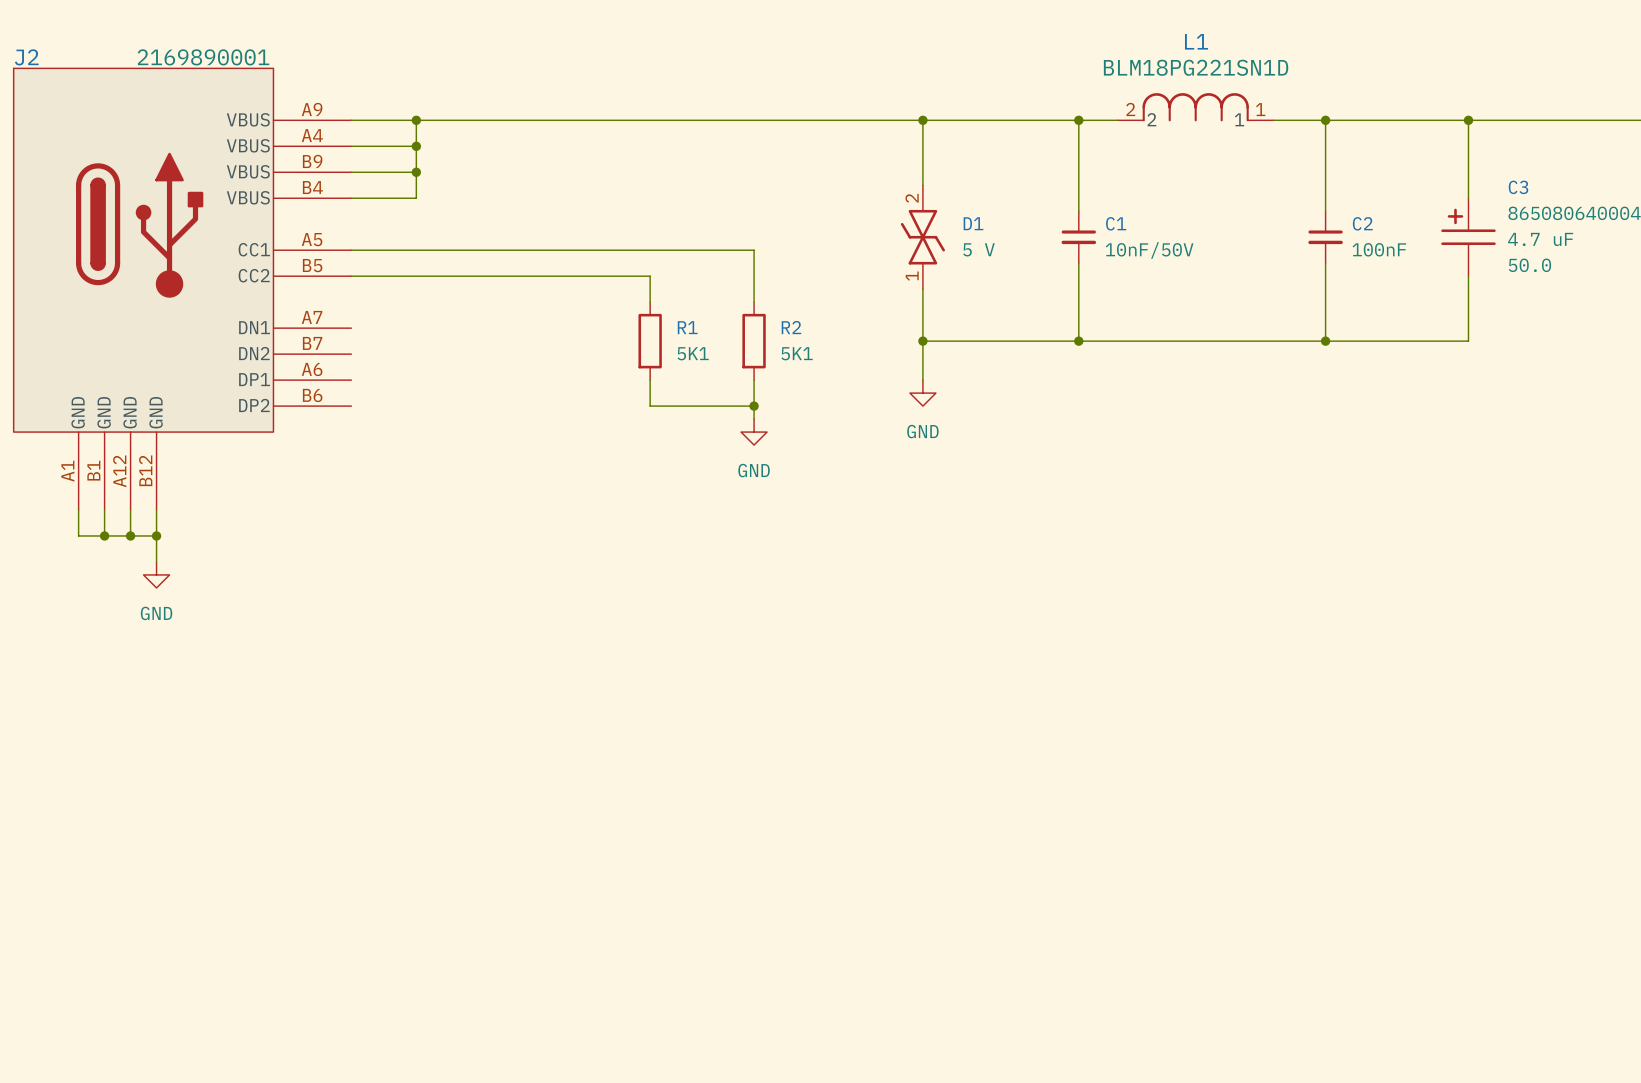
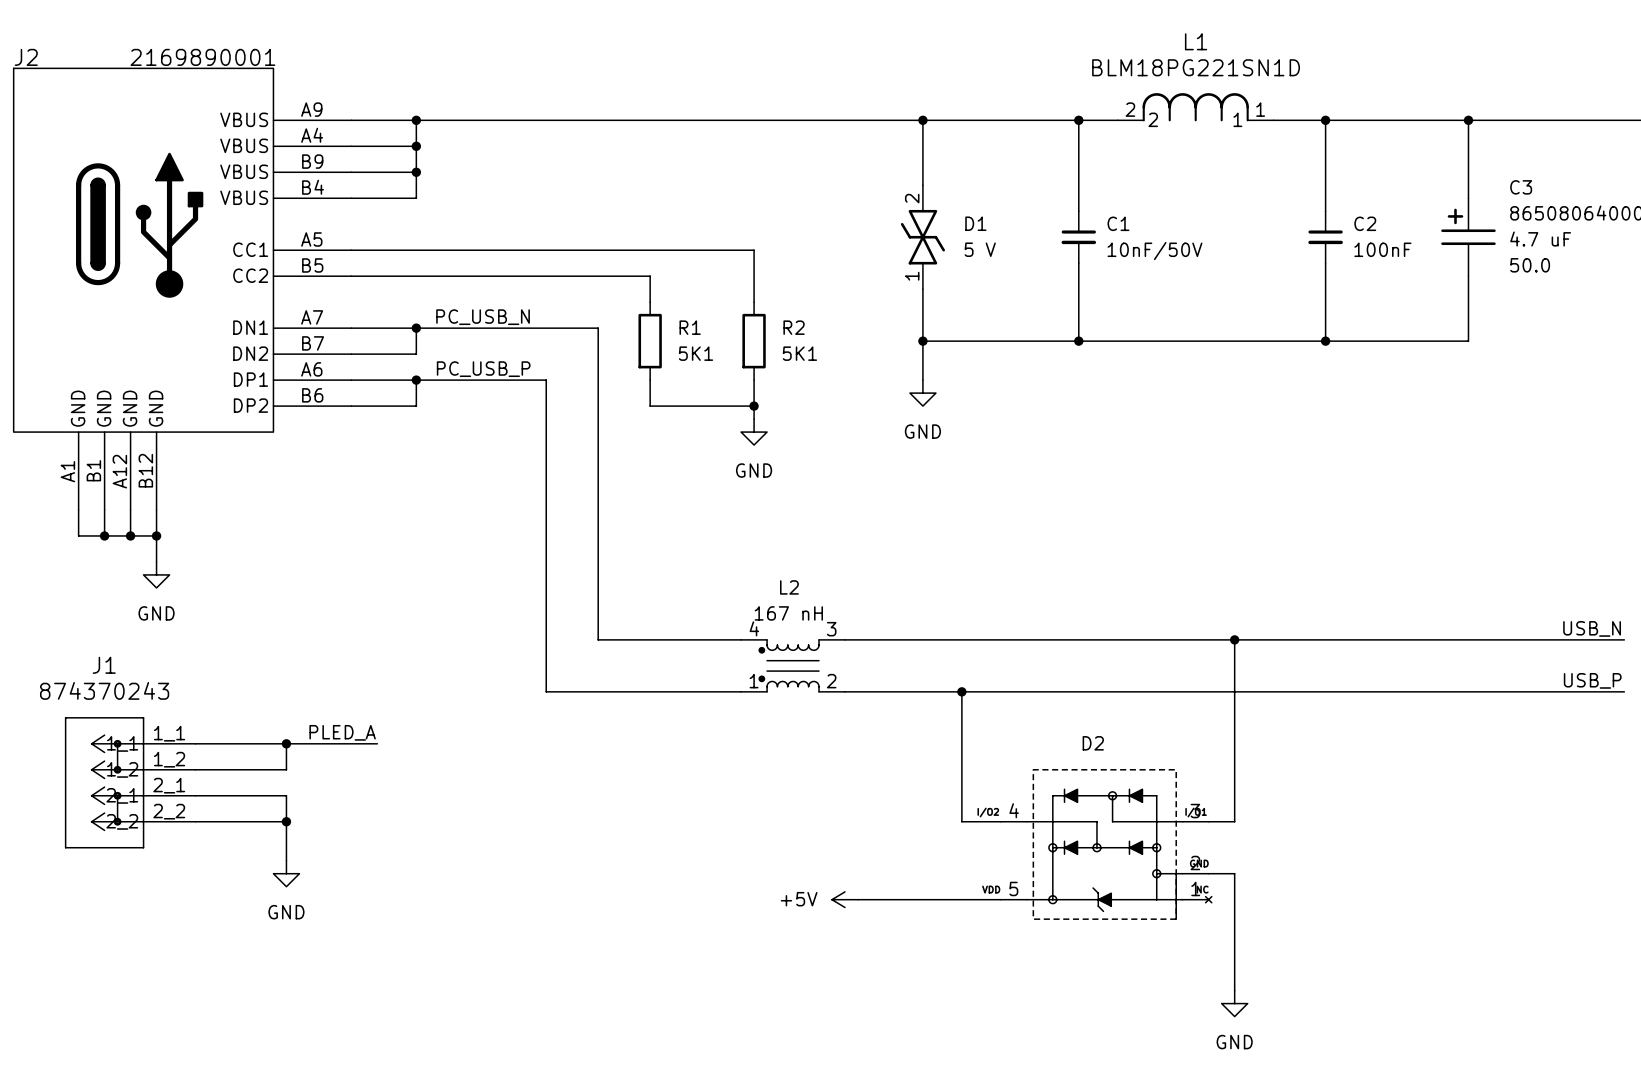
label: none -> PC_USB_N (483, 317)
wire: none -> (351, 328) (598, 328) (598, 639) (741, 639)
wire: none -> (416, 328) (416, 354) (351, 354)
junction: none -> (416, 328)
label: none -> PC_USB_P (483, 369)
wire: none -> (351, 380) (546, 380) (546, 691) (741, 691)
wire: none -> (416, 380) (416, 406) (351, 406)
junction: none -> (416, 380)
label: none -> USB_N (1592, 628)
wire: none -> (844, 639) (1624, 639)
wire: none -> (1234, 639) (1234, 821) (1208, 821)
junction: none -> (1234, 639)
L2: none -> (793, 665)
label: none -> USB_P (1592, 680)
wire: none -> (844, 691) (1624, 691)
wire: none -> (961, 691) (961, 821) (1000, 821)
junction: none -> (961, 691)
label: none -> PLED_A (342, 732)
wire: none -> (195, 743) (377, 743)
wire: none -> (286, 743) (286, 769) (195, 769)
junction: none -> (286, 743)
J1: none -> 874370243 (130, 782)
wire: none -> (195, 795) (286, 795) (286, 860)
wire: none -> (195, 821) (286, 821)
junction: none -> (286, 821)
D2: none -> (1106, 844)
power symbol: none -> GND (286, 873)
wire: none -> (1208, 873) (1234, 873) (1234, 990)
power symbol: none -> +5V (844, 899)
wire: none -> (857, 899) (1000, 899)
power symbol: none -> GND (1234, 1003)

